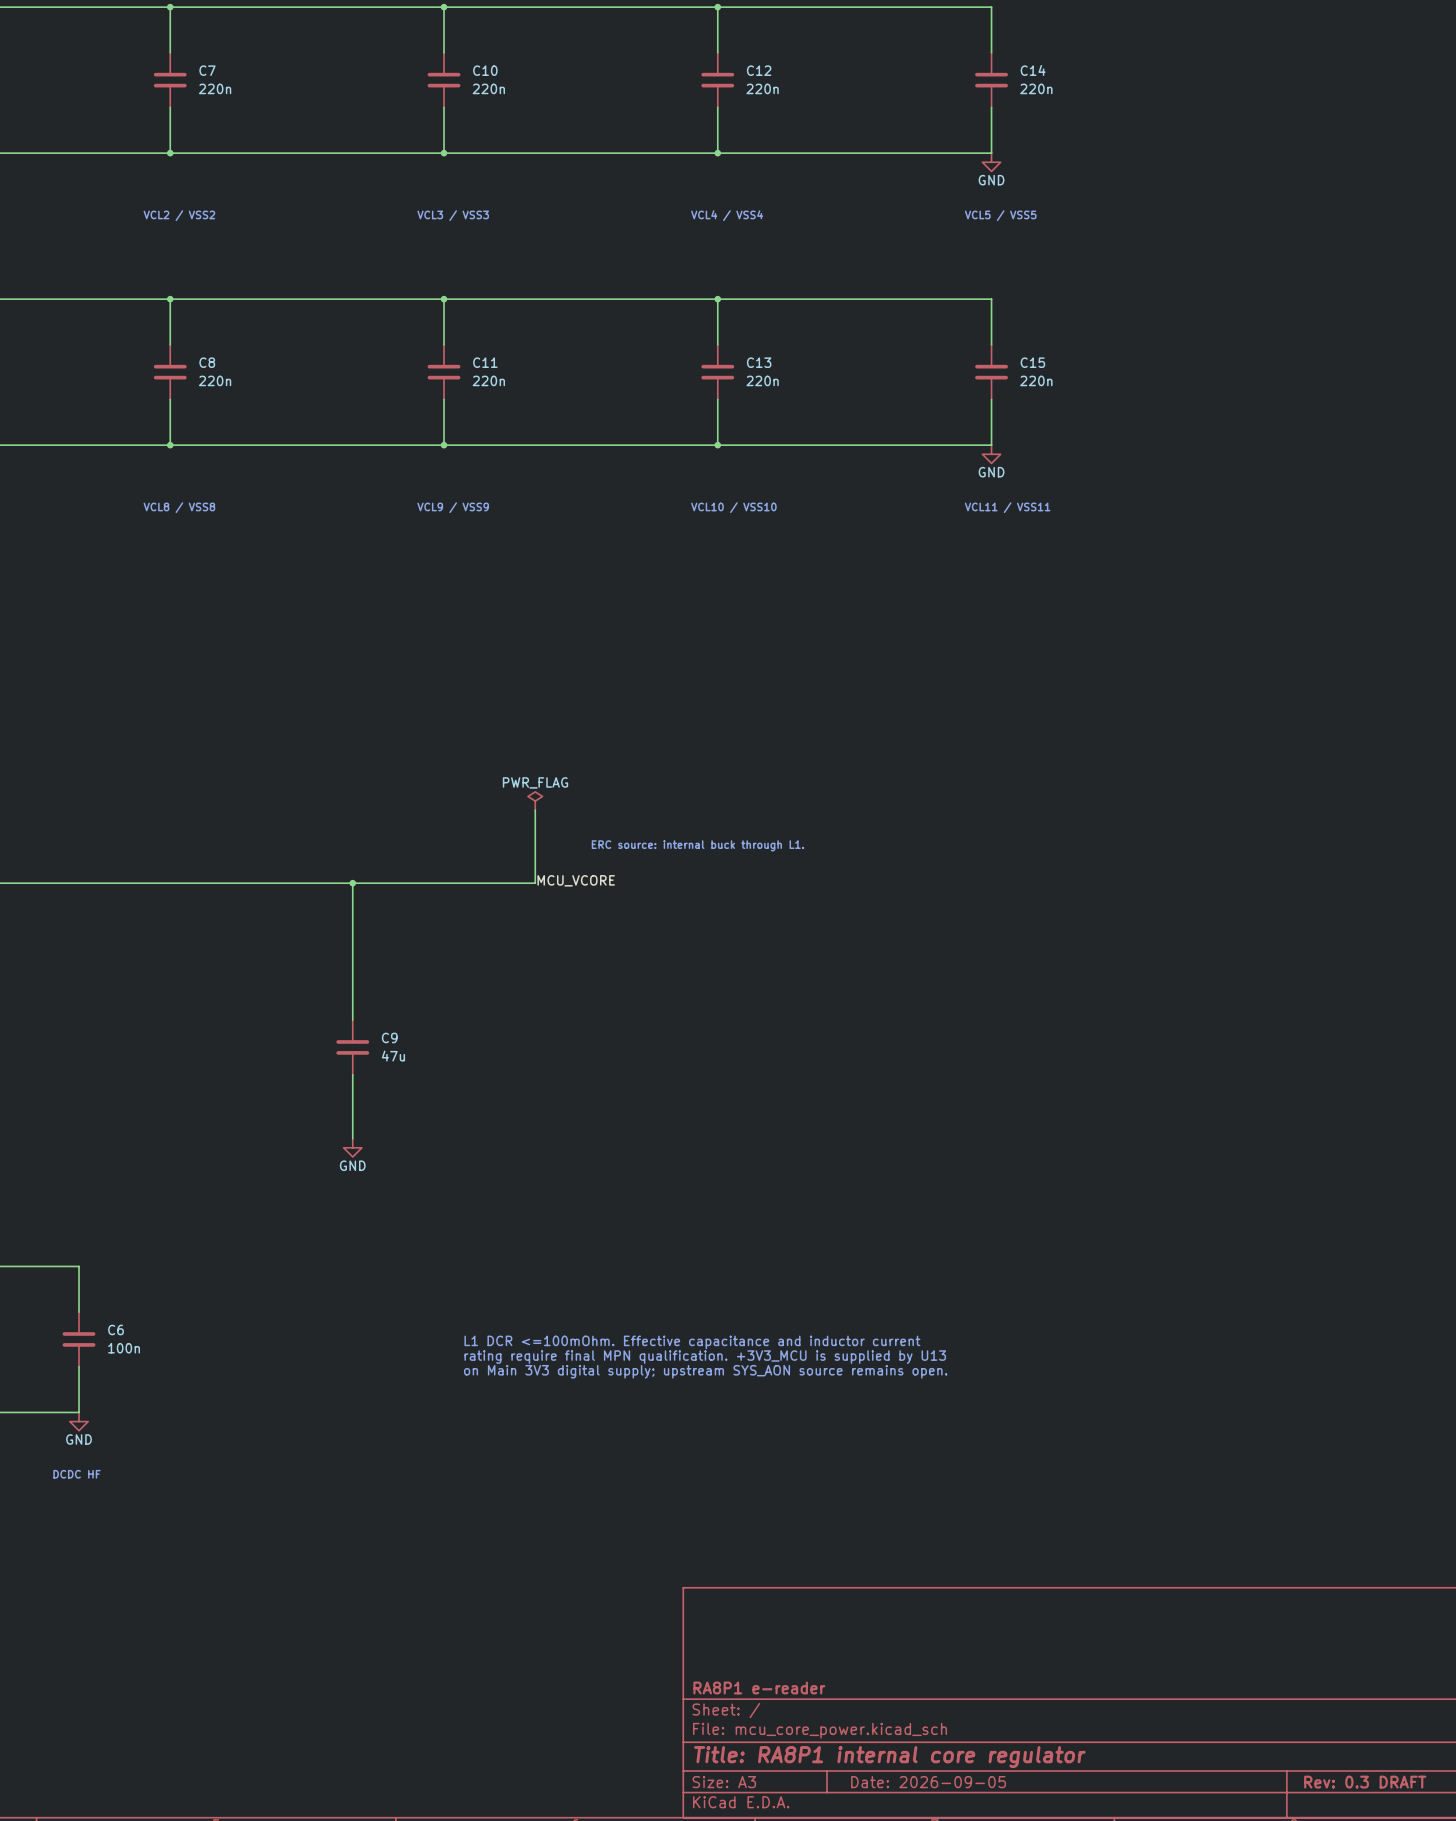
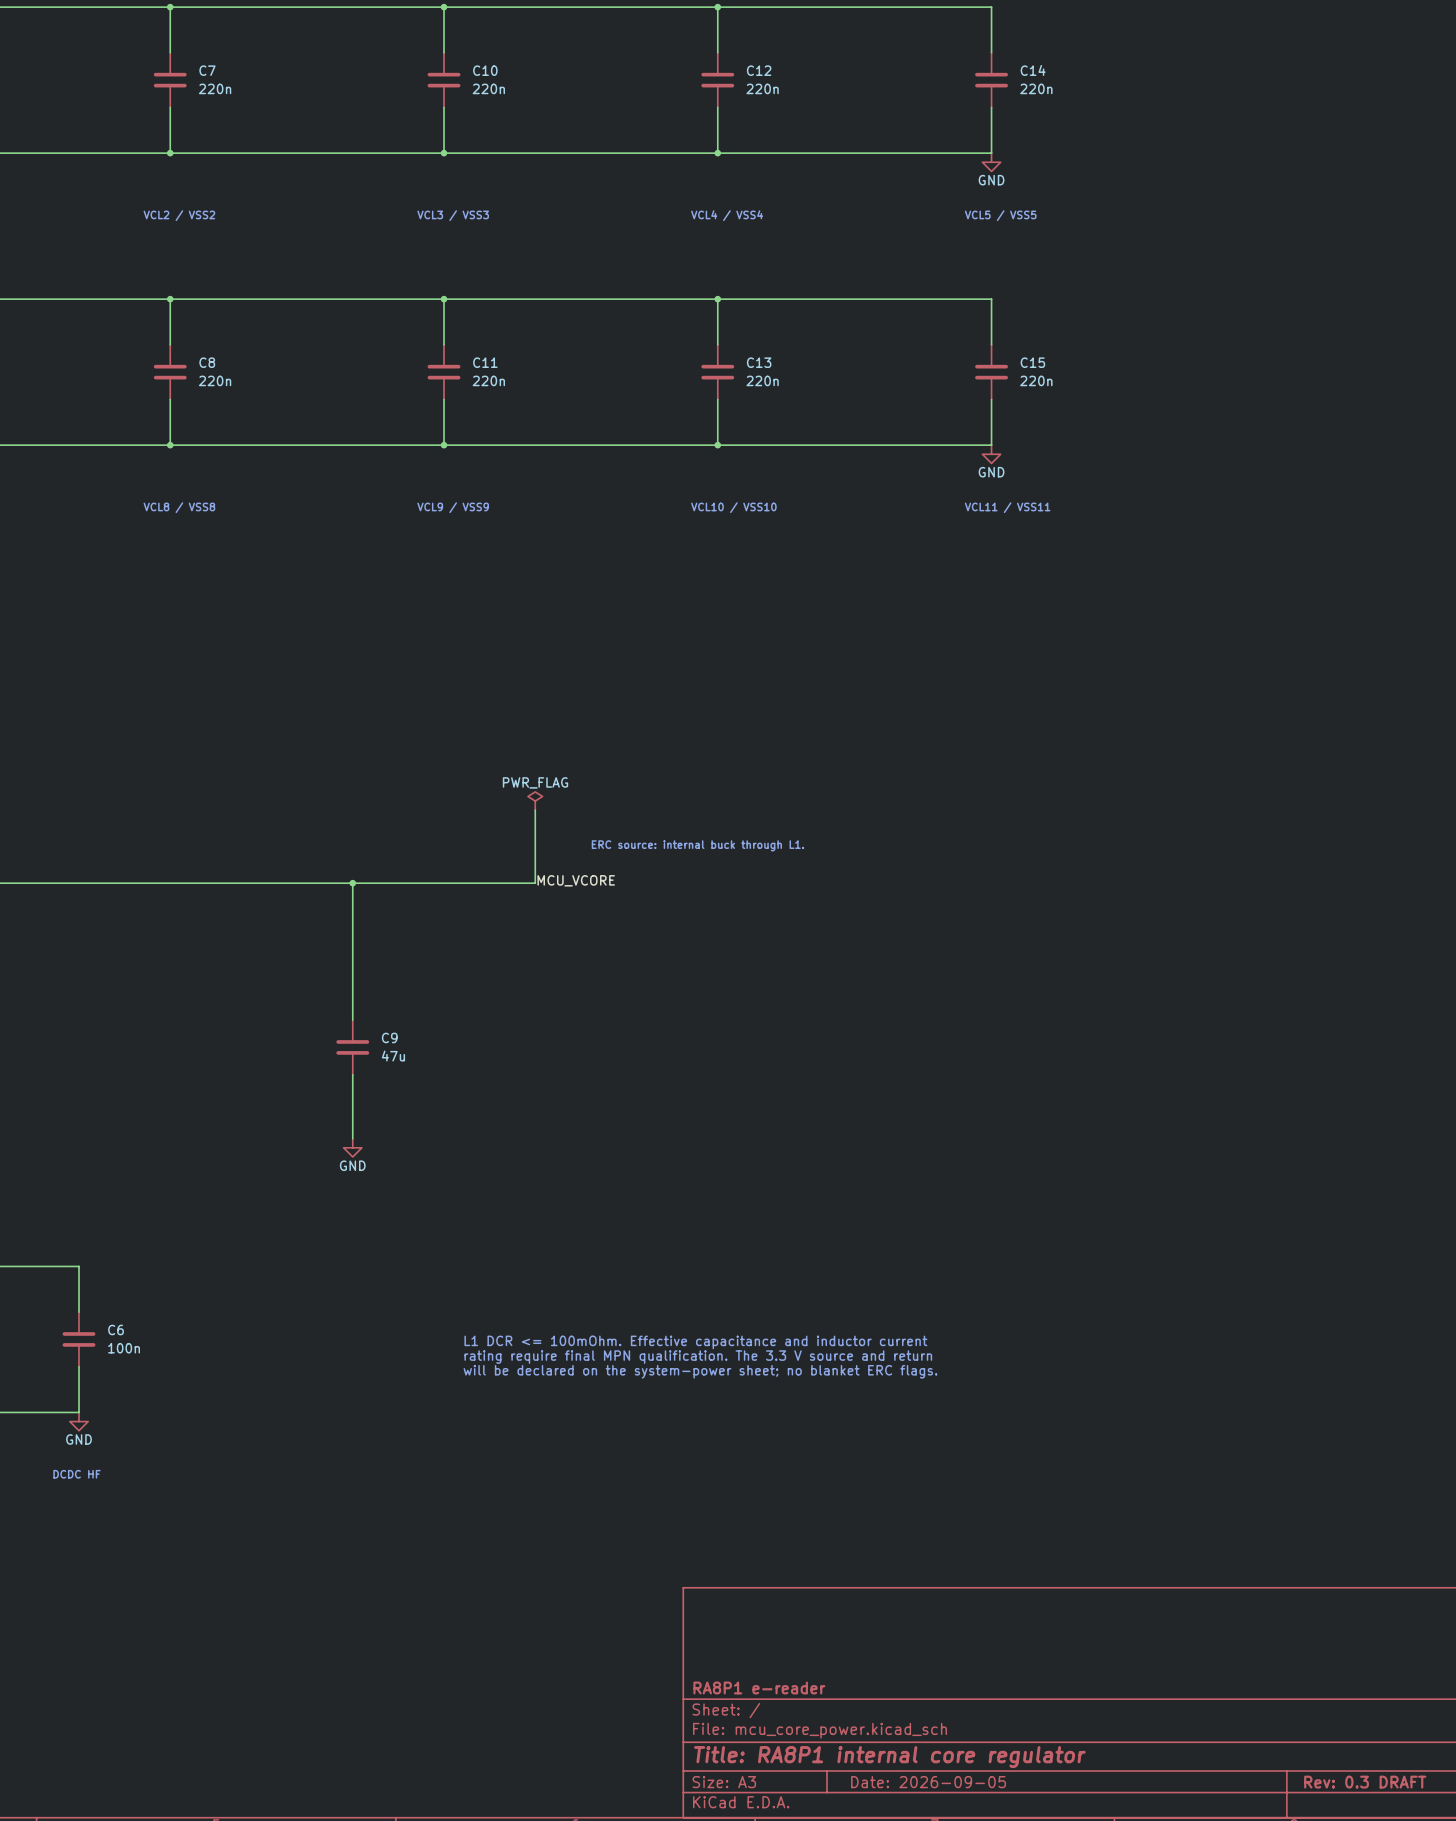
text: L1 DCR <=100mOhm. Effective capacitance and inductor current (692, 1342) -> L1 DCR <= 100mOhm. Effective capacitance and inductor current (695, 1342)
text: rating require final MPN qualification. +3V3_MCU is supplied by U13 (705, 1357) -> rating require final MPN qualification. The 3.3 V source and return (698, 1357)
text: on Main 3V3 digital supply; upstream SYS_AON source remains open. (705, 1371) -> will be declared on the system-power sheet; no blanket ERC flags. (700, 1371)

